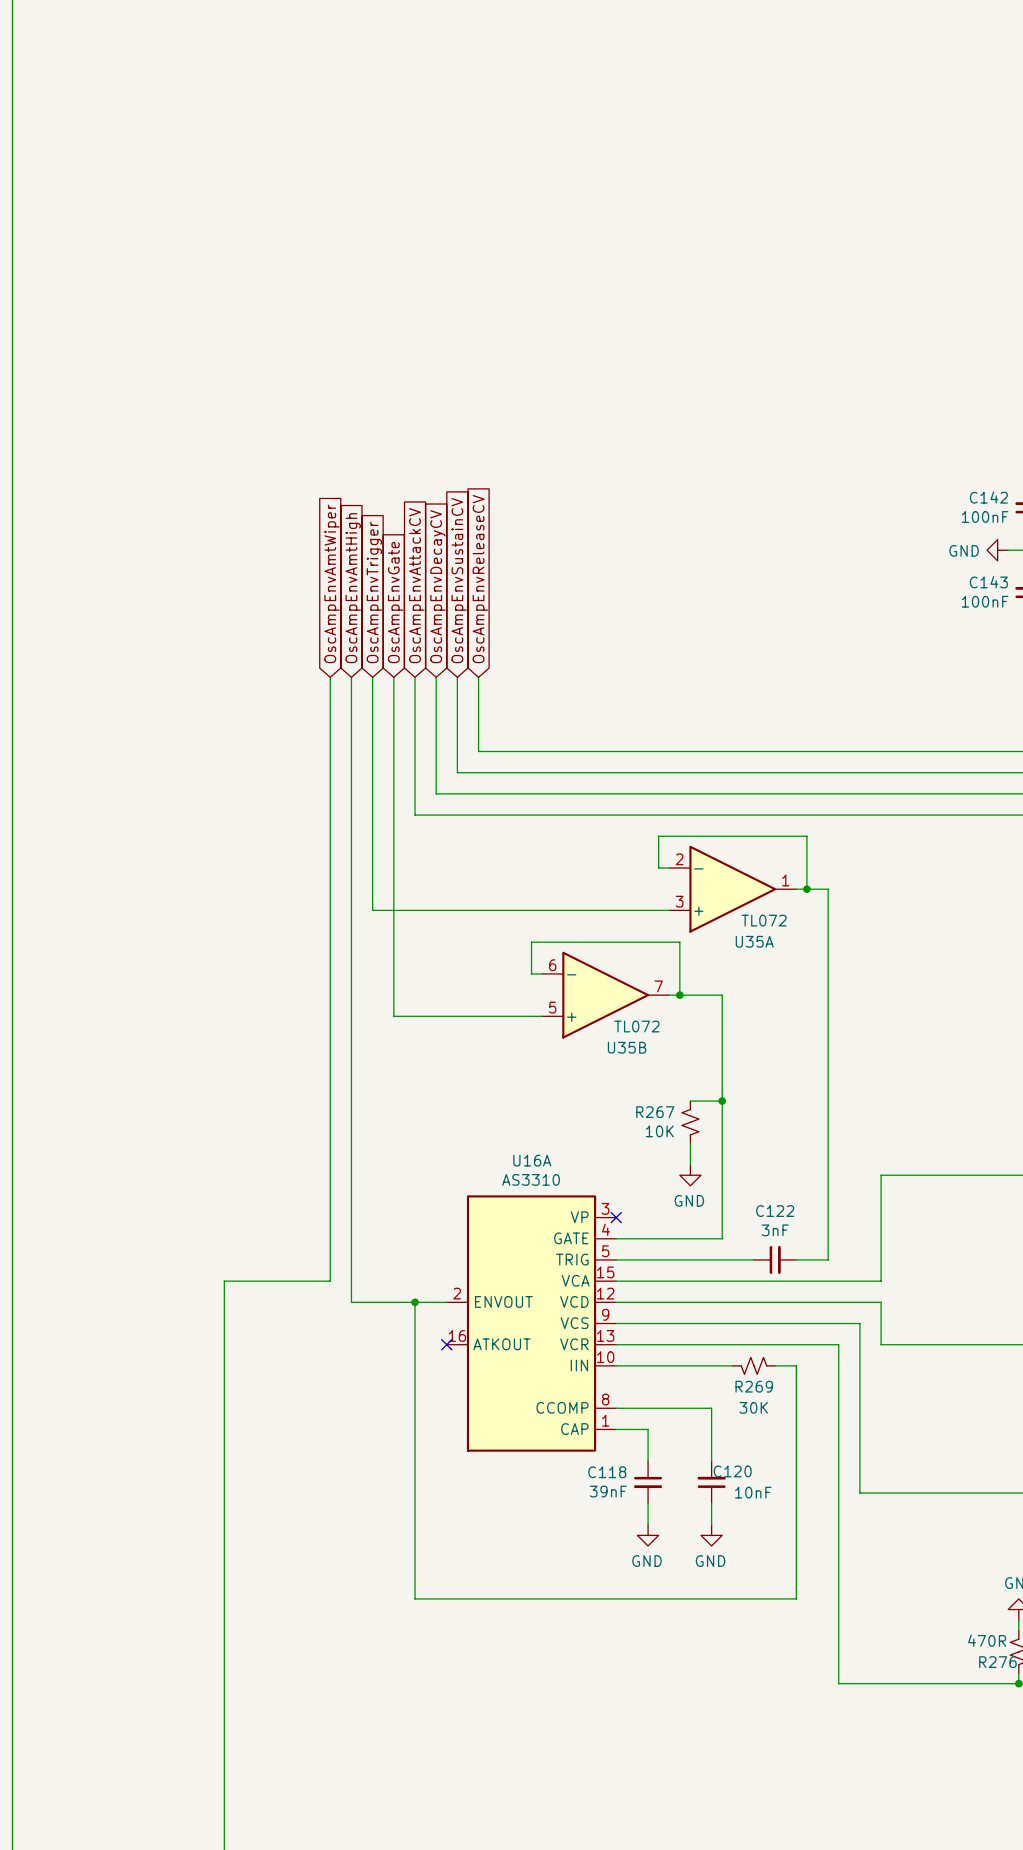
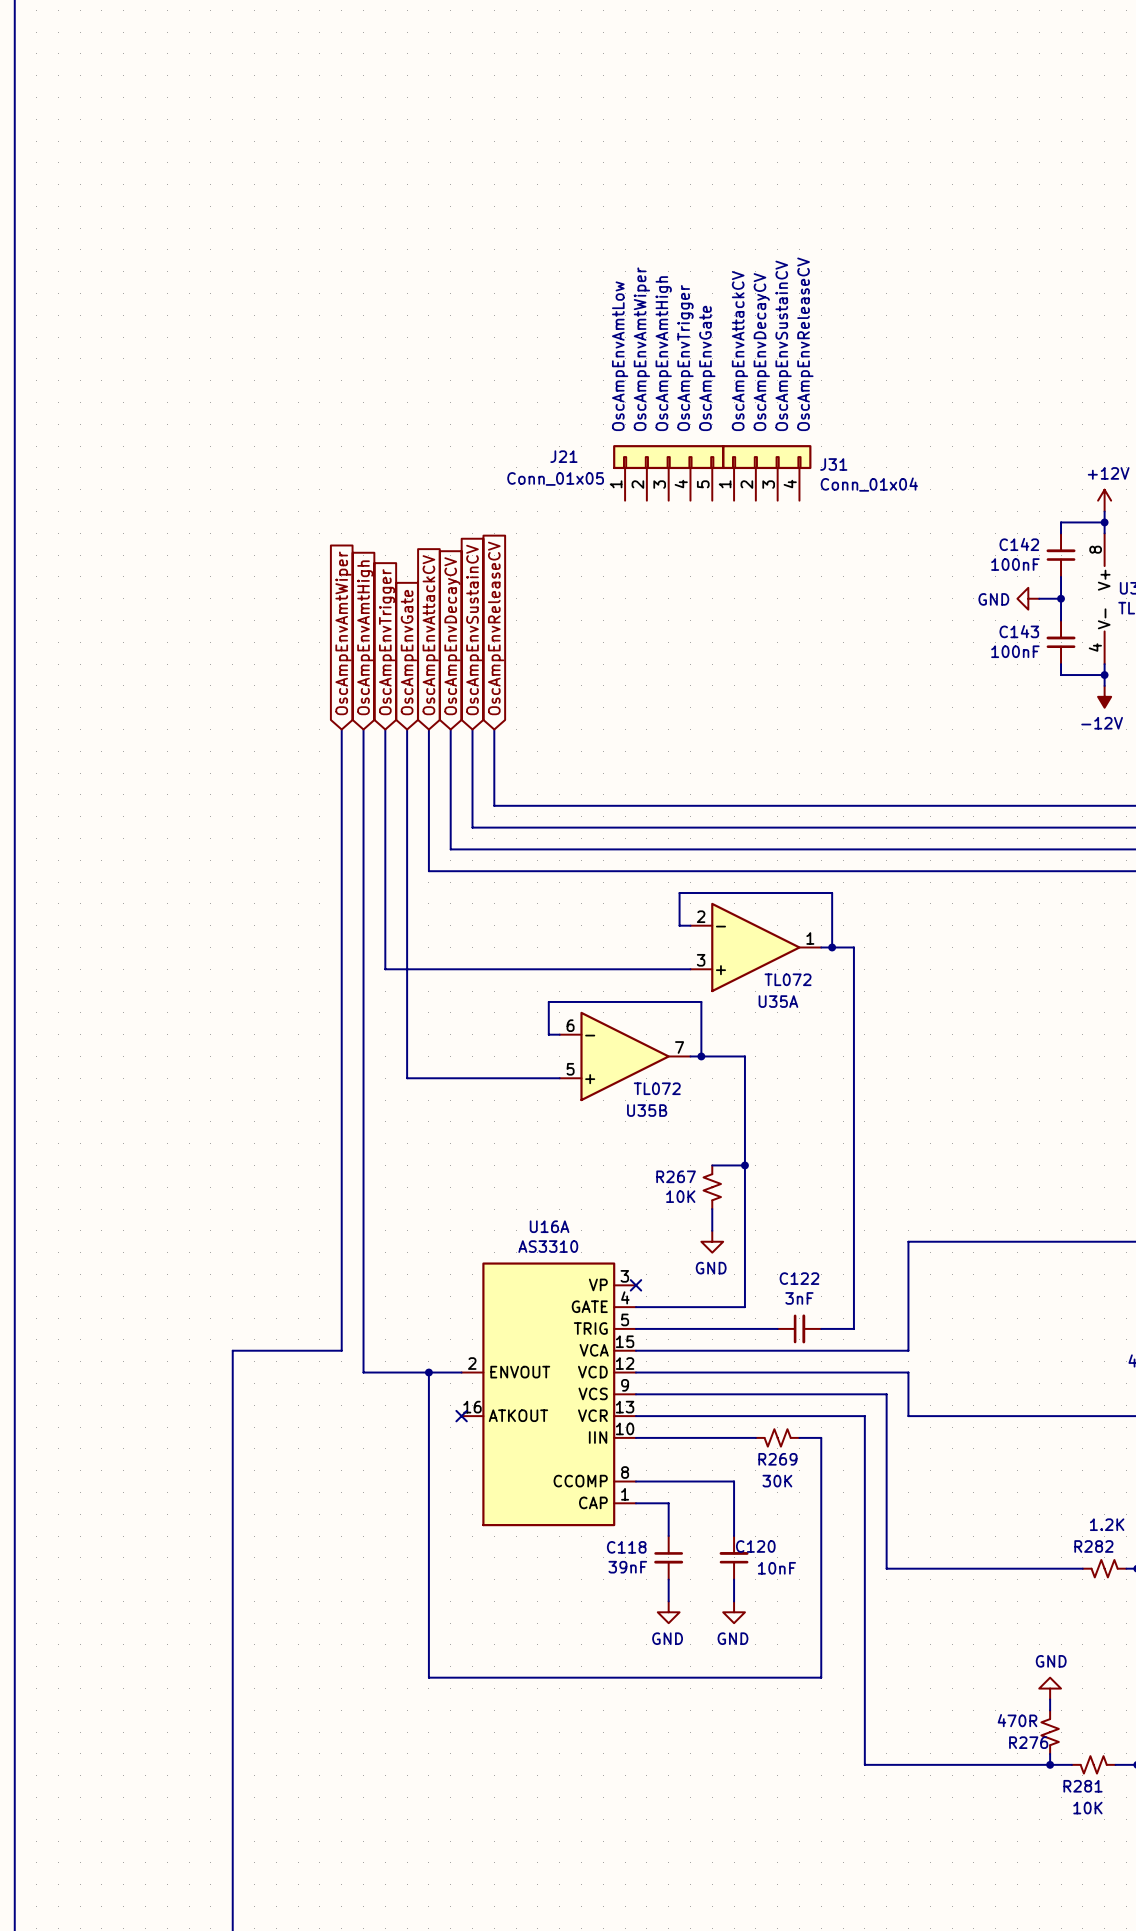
text: none -> OscAmpEnvReleaseCV (805, 344)
text: none -> OscAmpEnvSustainCV (783, 345)
text: none -> OscAmpEnvAmtWiper (641, 349)
text: none -> OscAmpEnvAttackCV (740, 351)
text: none -> OscAmpEnvDecayCV (761, 352)
text: none -> OscAmpEnvAmtHigh (663, 353)
text: none -> OscAmpEnvAmtLow (620, 356)
text: none -> OscAmpEnvTrigger (685, 358)
text: none -> OscAmpEnvGate (707, 368)
J21: none -> Conn_01x05 (668, 472)
J31: none -> Conn_01x04 (766, 472)

